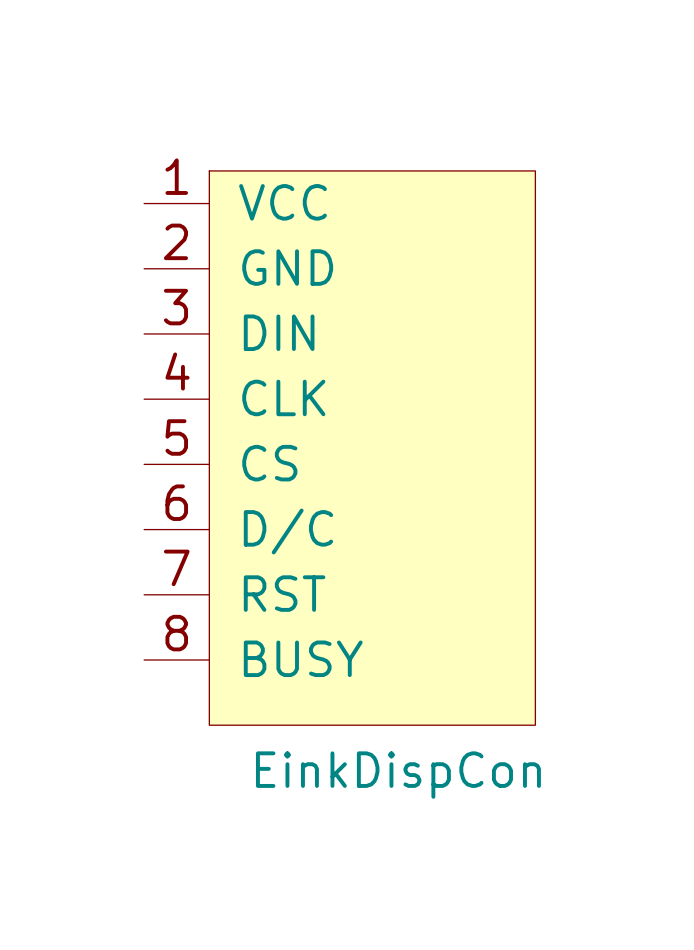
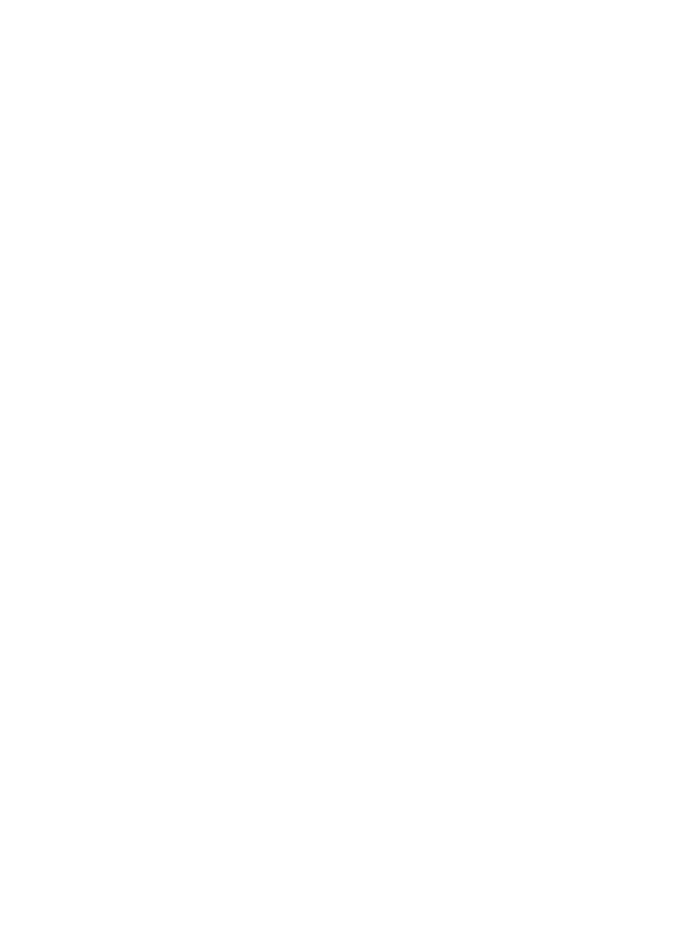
EinkDispCon: (339, 448) -> none

